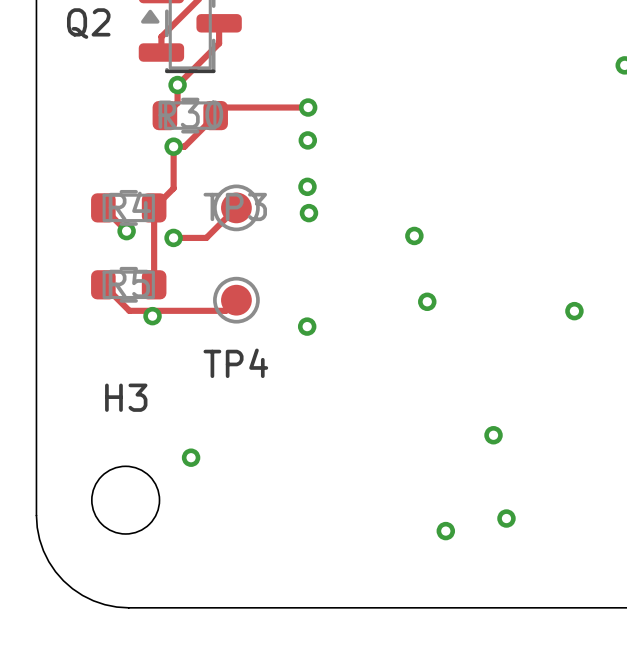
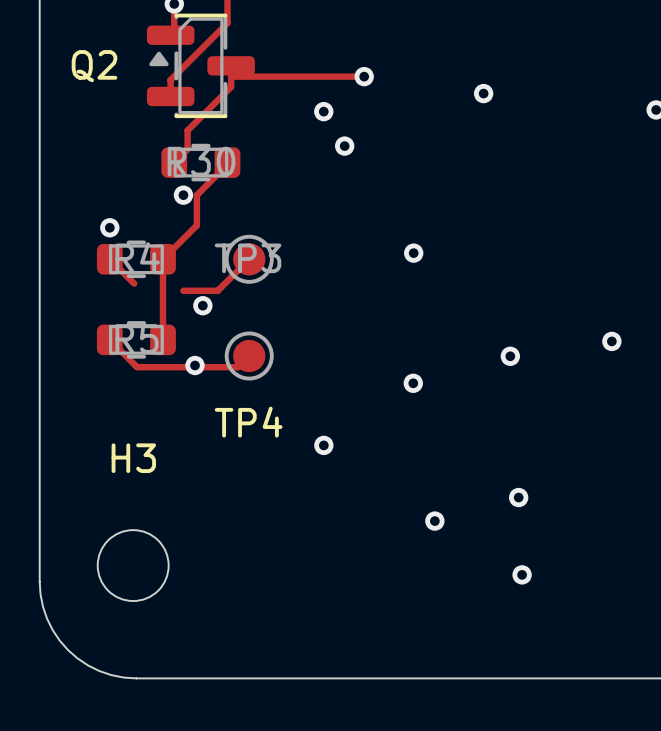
track: none -> (231, 76) (364, 76)
via: none -> (364, 76)
via: none -> (483, 93)
via: none -> (323, 111)
via: (177, 85) -> none
via: none -> (344, 146)
track: (308, 107) (223, 107) (184, 146) (173, 146) (173, 188) -> (227, 162) (196, 195) (196, 225) (183, 238)
via: (308, 107) -> none
via: (307, 140) -> none
via: none -> (109, 227)
via: (307, 186) -> none
via: (308, 213) -> none
via: (126, 231) -> none
via position: (414, 235) -> (413, 253)
via position: (173, 237) -> (202, 305)
via: none -> (510, 356)
via: (427, 301) -> none
via position: (574, 311) -> (611, 341)
via position: (152, 316) -> (195, 365)
via: (307, 326) -> none
via: none -> (413, 383)
via: none -> (323, 445)
via: (191, 457) -> none
via: none -> (434, 521)
via position: (506, 518) -> (522, 574)
via: (445, 531) -> none

